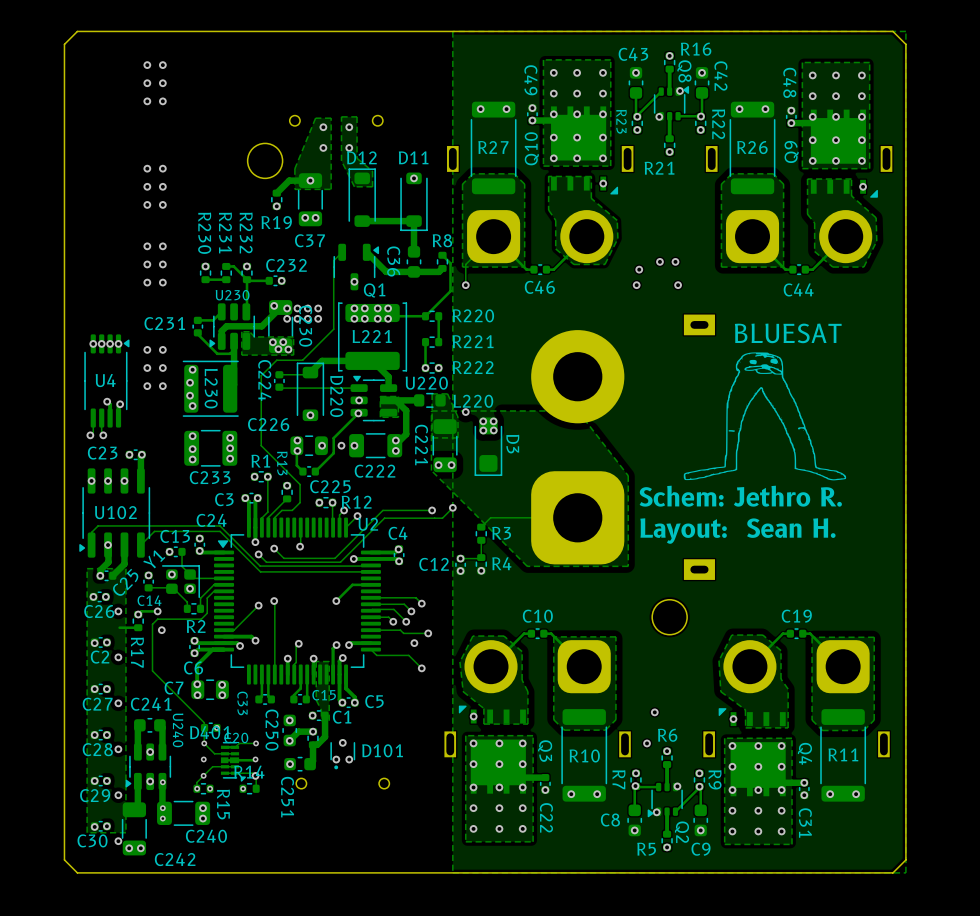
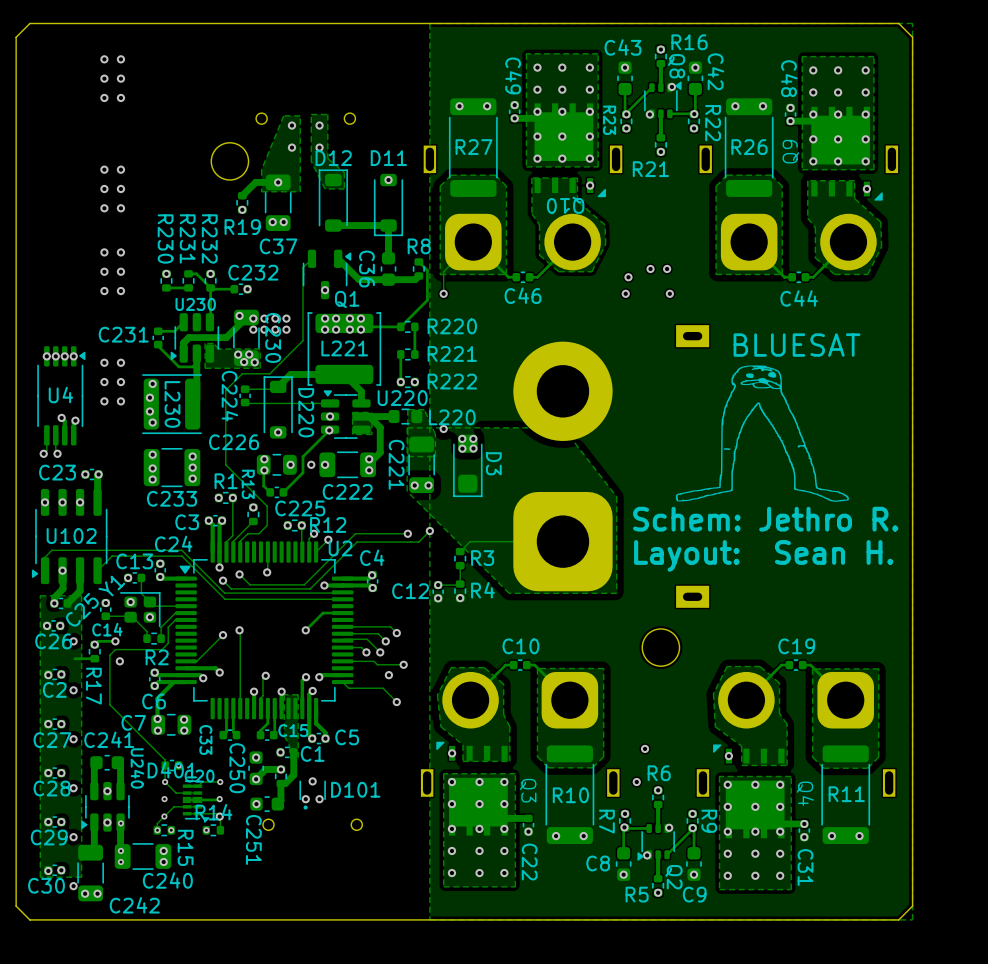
Q10 name rotation: 0° (531, 148) -> 90° counterclockwise (565, 205)
Q10 name position: Q10 (531, 148) -> Q10 (565, 205)

